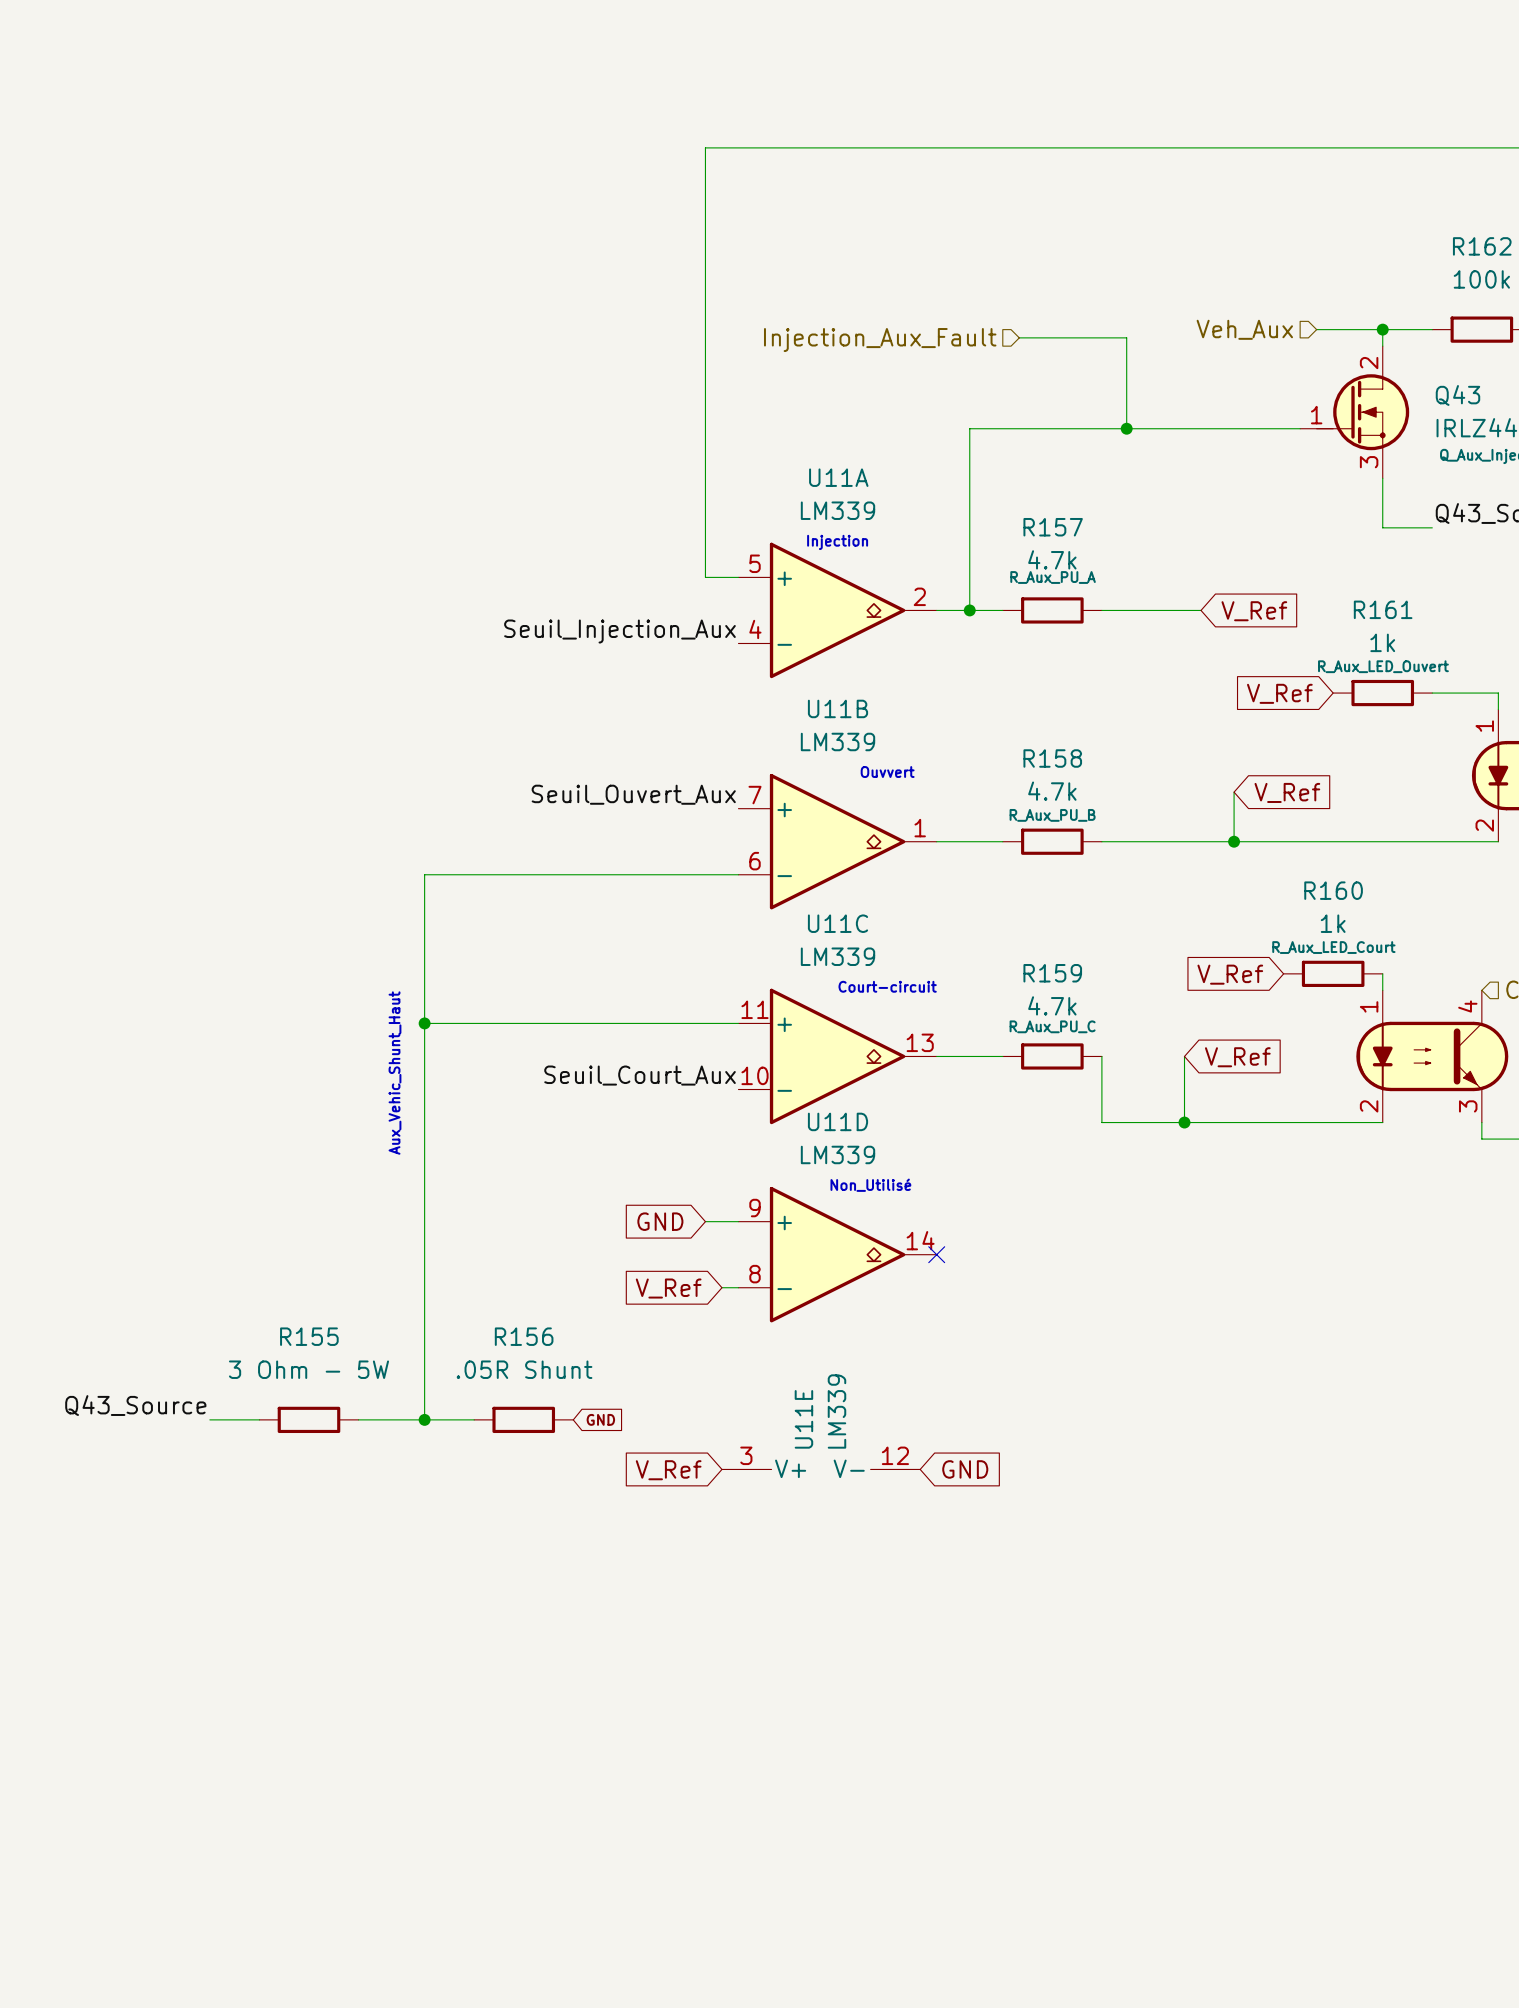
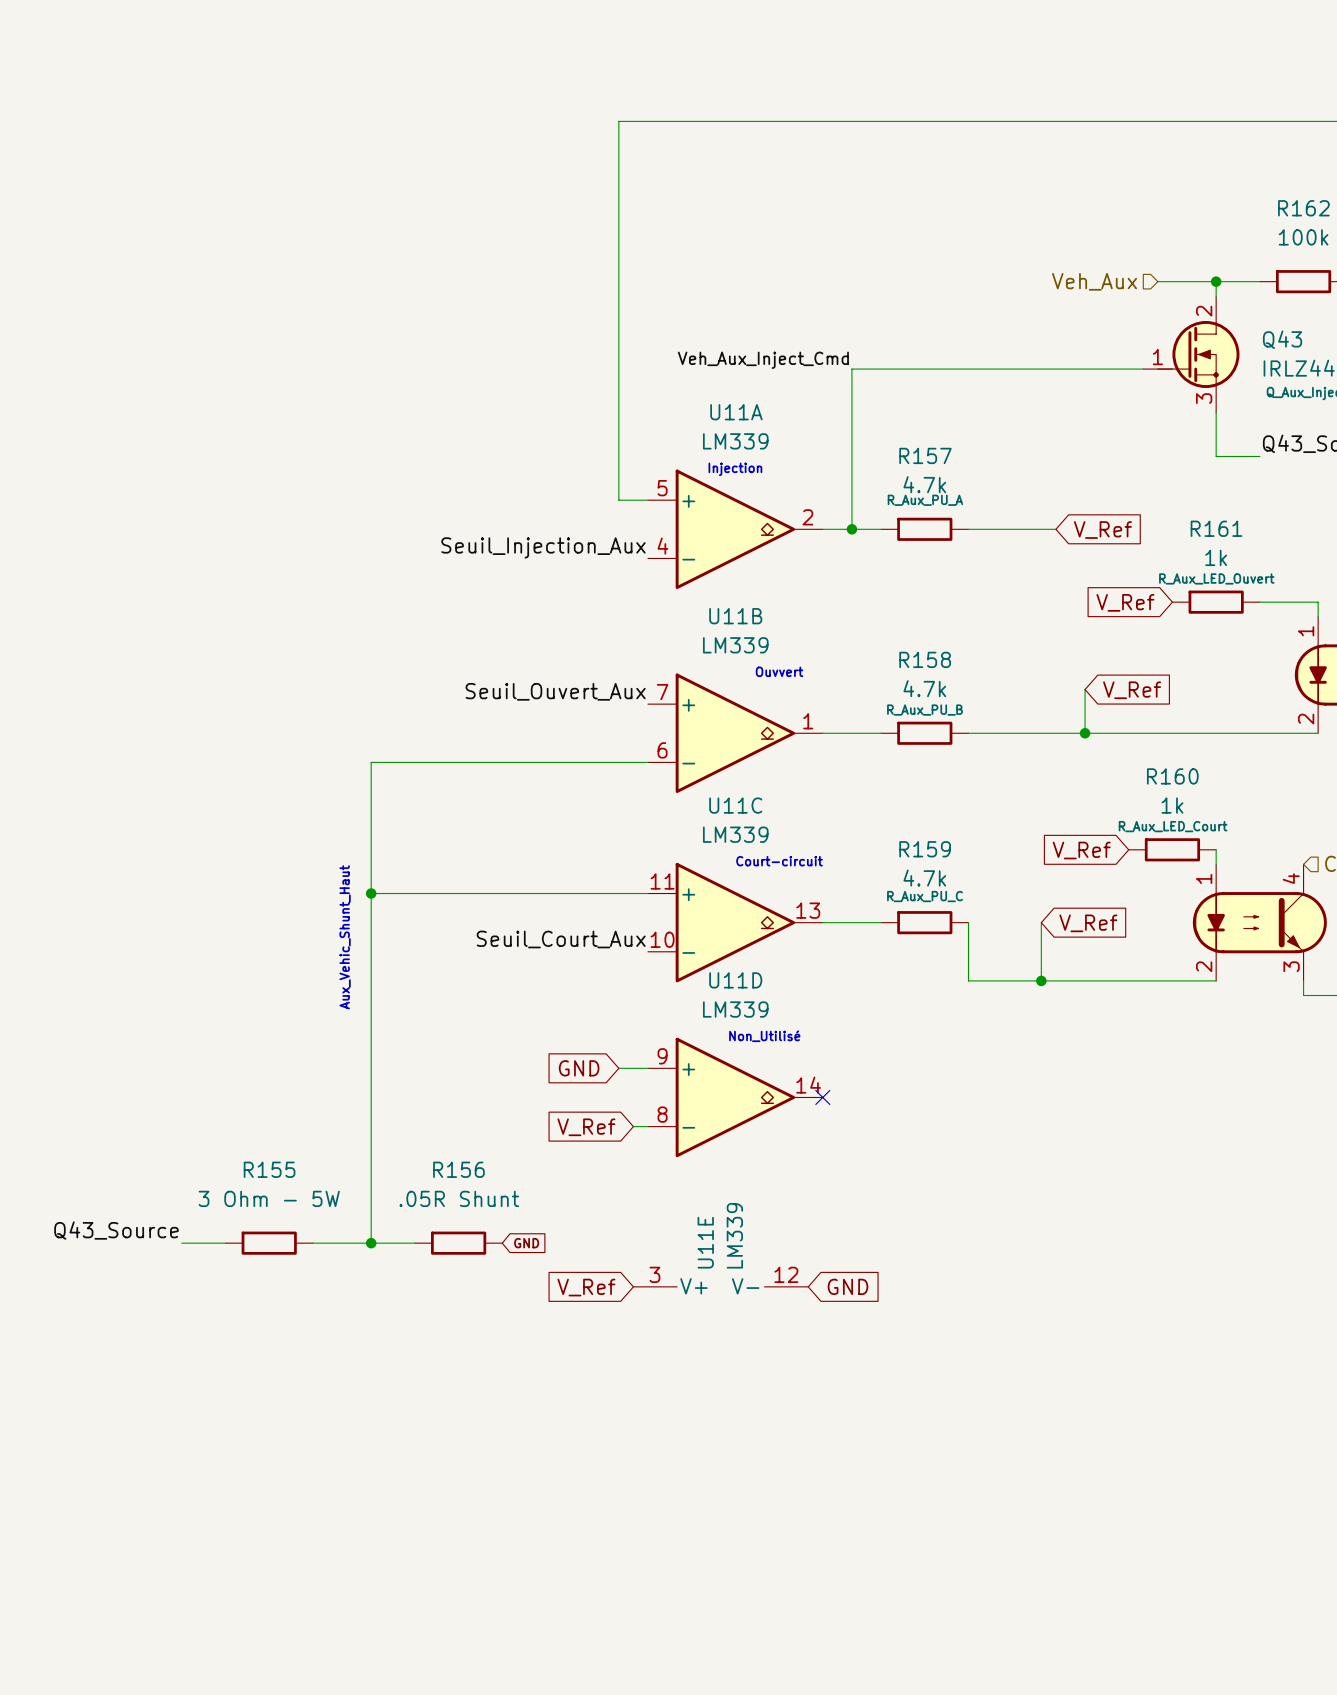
wire: (1019, 337) (1126, 337) (1126, 428) -> none
hierarchical label: Injection_Aux_Fault (880, 340) -> none
label: none -> Veh_Aux_Inject_Cmd (763, 360)
junction: (1126, 428) -> none

